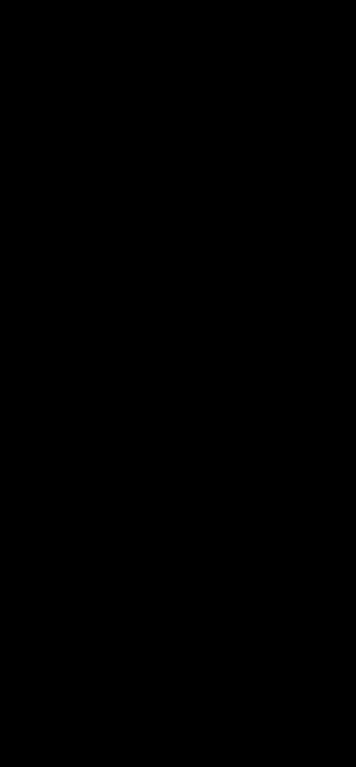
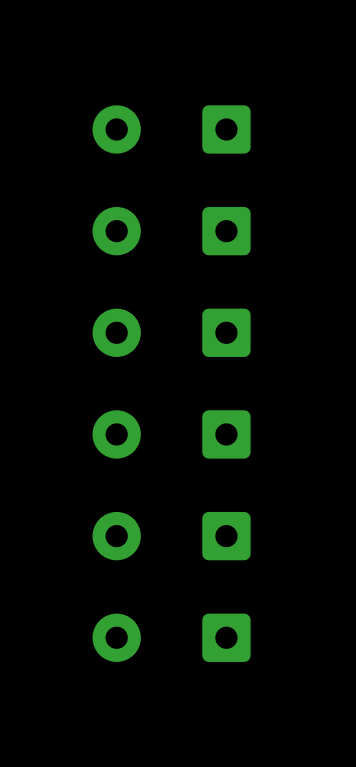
part: none -> (171, 129)
part: none -> (171, 231)
part: none -> (171, 332)
part: none -> (171, 434)
part: none -> (171, 536)
part: none -> (171, 637)

